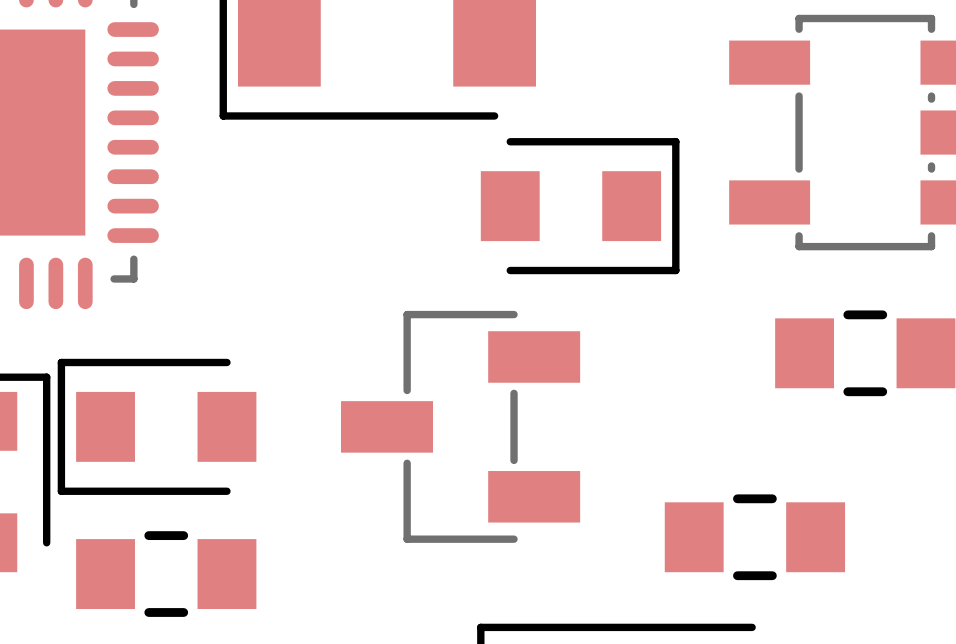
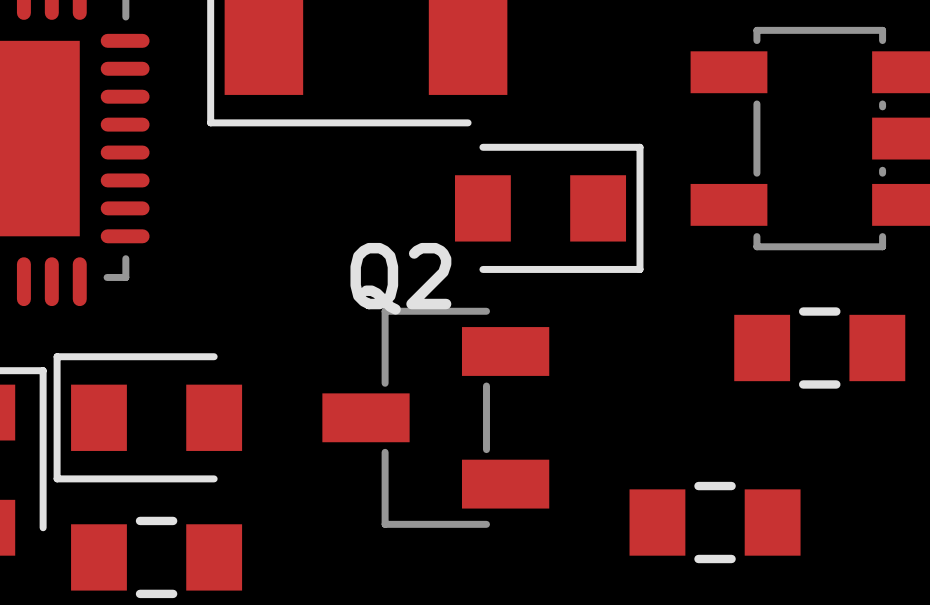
text: none -> Q2 (400, 278)

